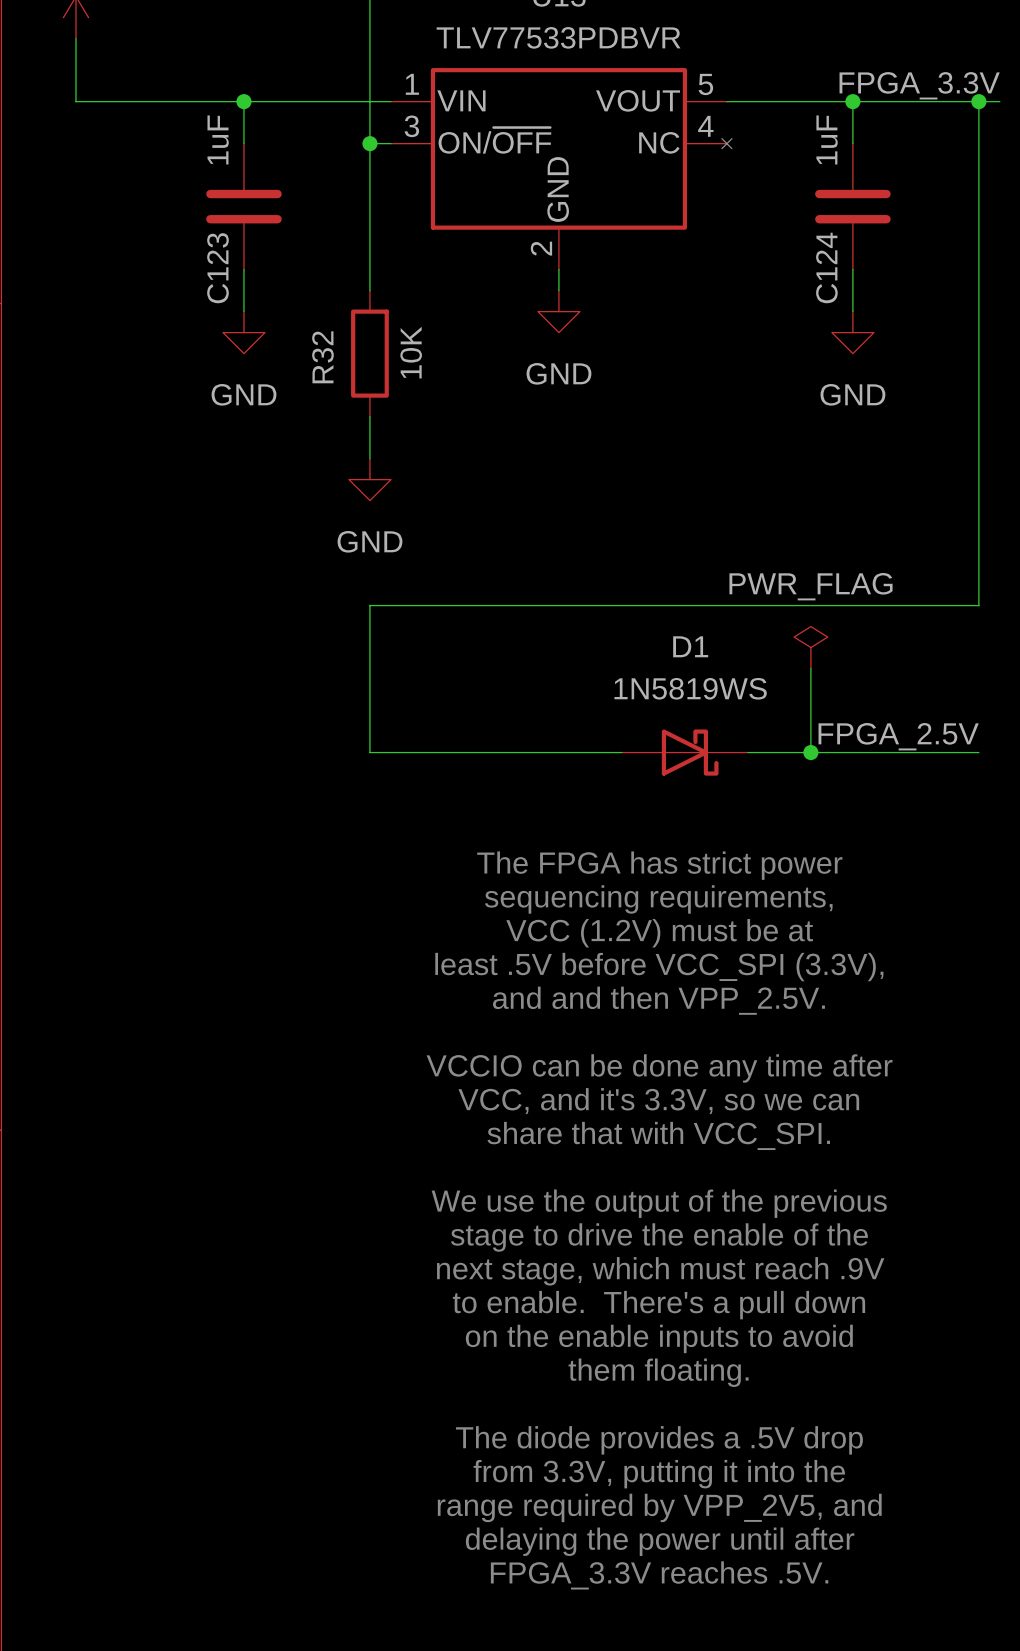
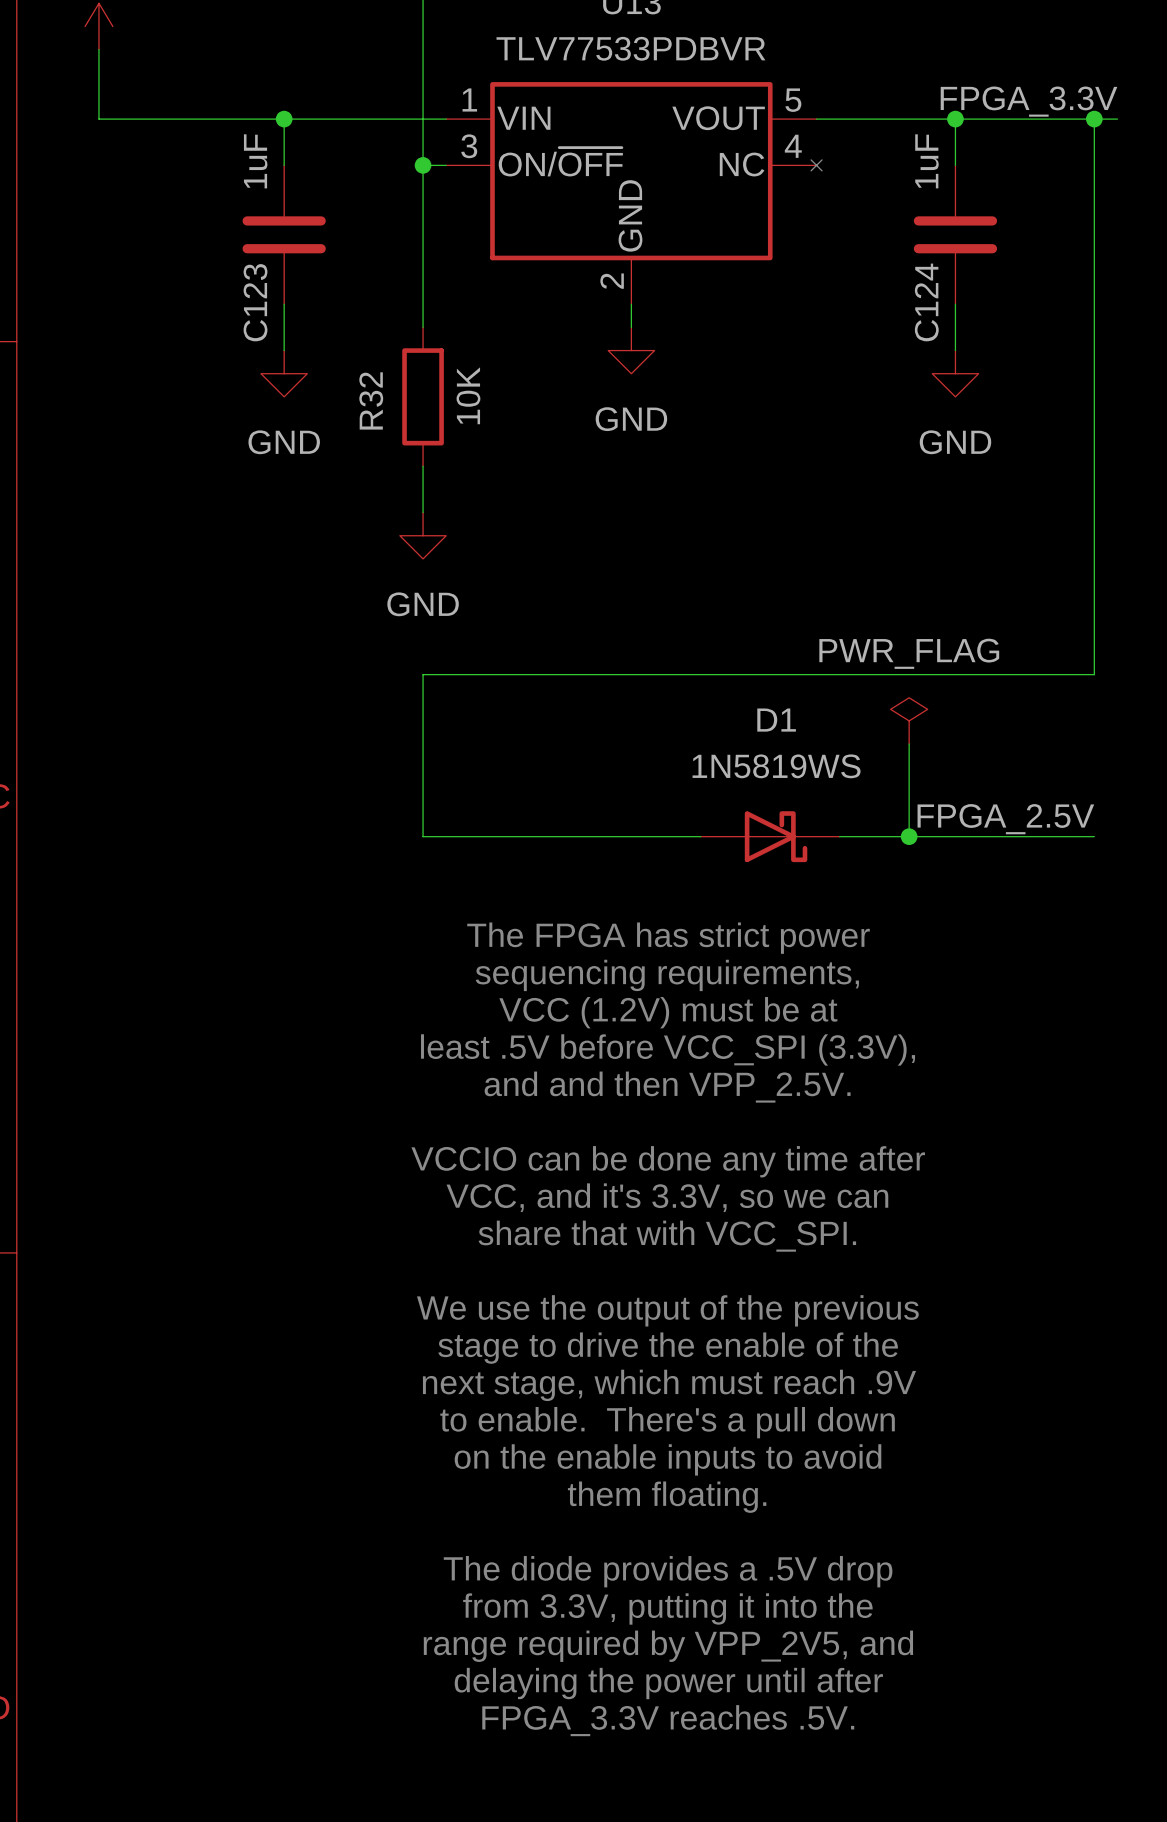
text position: The FPGA has strict power (659, 865) -> The FPGA has strict power (668, 938)
text position: sequencing requirements, (658, 899) -> sequencing requirements, (667, 975)
text position: VCC (1.2V) must be at (659, 933) -> VCC (1.2V) must be at (668, 1012)
text position: least .5V before VCC_SPI (3.3V), (659, 967) -> least .5V before VCC_SPI (3.3V), (668, 1049)
text position: and and then VPP_2.5V. (658, 1000) -> and and then VPP_2.5V. (667, 1087)
text position: VCCIO can be done any time after (659, 1068) -> VCCIO can be done any time after (668, 1161)
text position: VCC, and it's 3.3V, so we can (658, 1101) -> VCC, and it's 3.3V, so we can (667, 1197)
text position: share that with VCC_SPI. (658, 1135) -> share that with VCC_SPI. (667, 1236)
text position: We use the output of the previous (659, 1203) -> We use the output of the previous (667, 1310)
text position: stage to drive the enable of the (659, 1237) -> stage to drive the enable of the (668, 1348)
text position: next stage, which must reach .9V (660, 1271) -> next stage, which must reach .9V (669, 1385)
text position: to enable. There's a pull down (658, 1305) -> to enable. There's a pull down (667, 1422)
text position: on the enable inputs to avoid (659, 1338) -> on the enable inputs to avoid (668, 1459)
text position: them floating. (658, 1372) -> them floating. (667, 1497)
text position: The diode provides a .5V drop (659, 1440) -> The diode provides a .5V drop (668, 1571)
text position: from 3.3V, putting it into the (659, 1474) -> from 3.3V, putting it into the (667, 1608)
text position: range required by VPP_2V5, and (659, 1507) -> range required by VPP_2V5, and (668, 1646)
text position: delaying the power until after (660, 1541) -> delaying the power until after (668, 1683)
text position: FPGA_3.3V reaches .5V. (659, 1575) -> FPGA_3.3V reaches .5V. (668, 1720)

